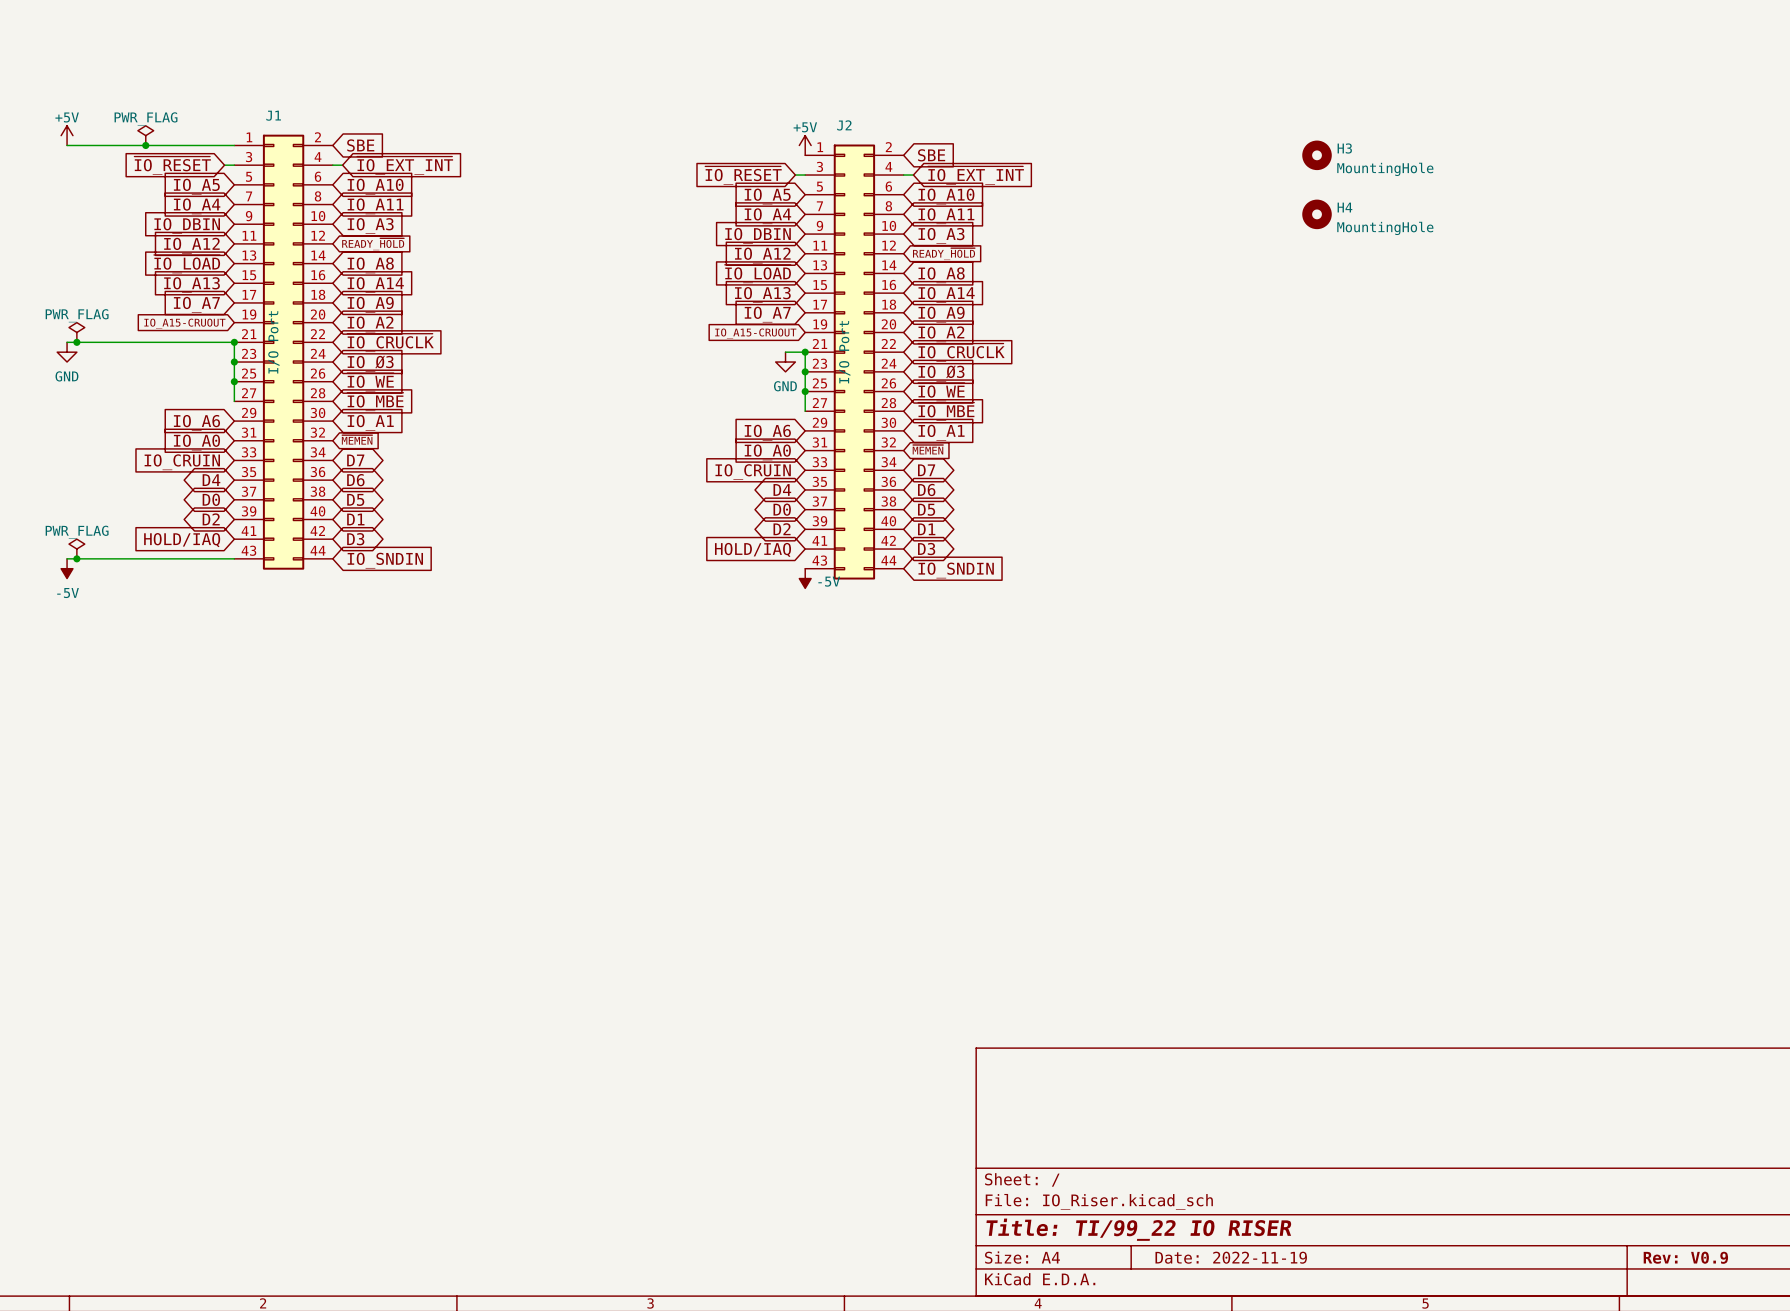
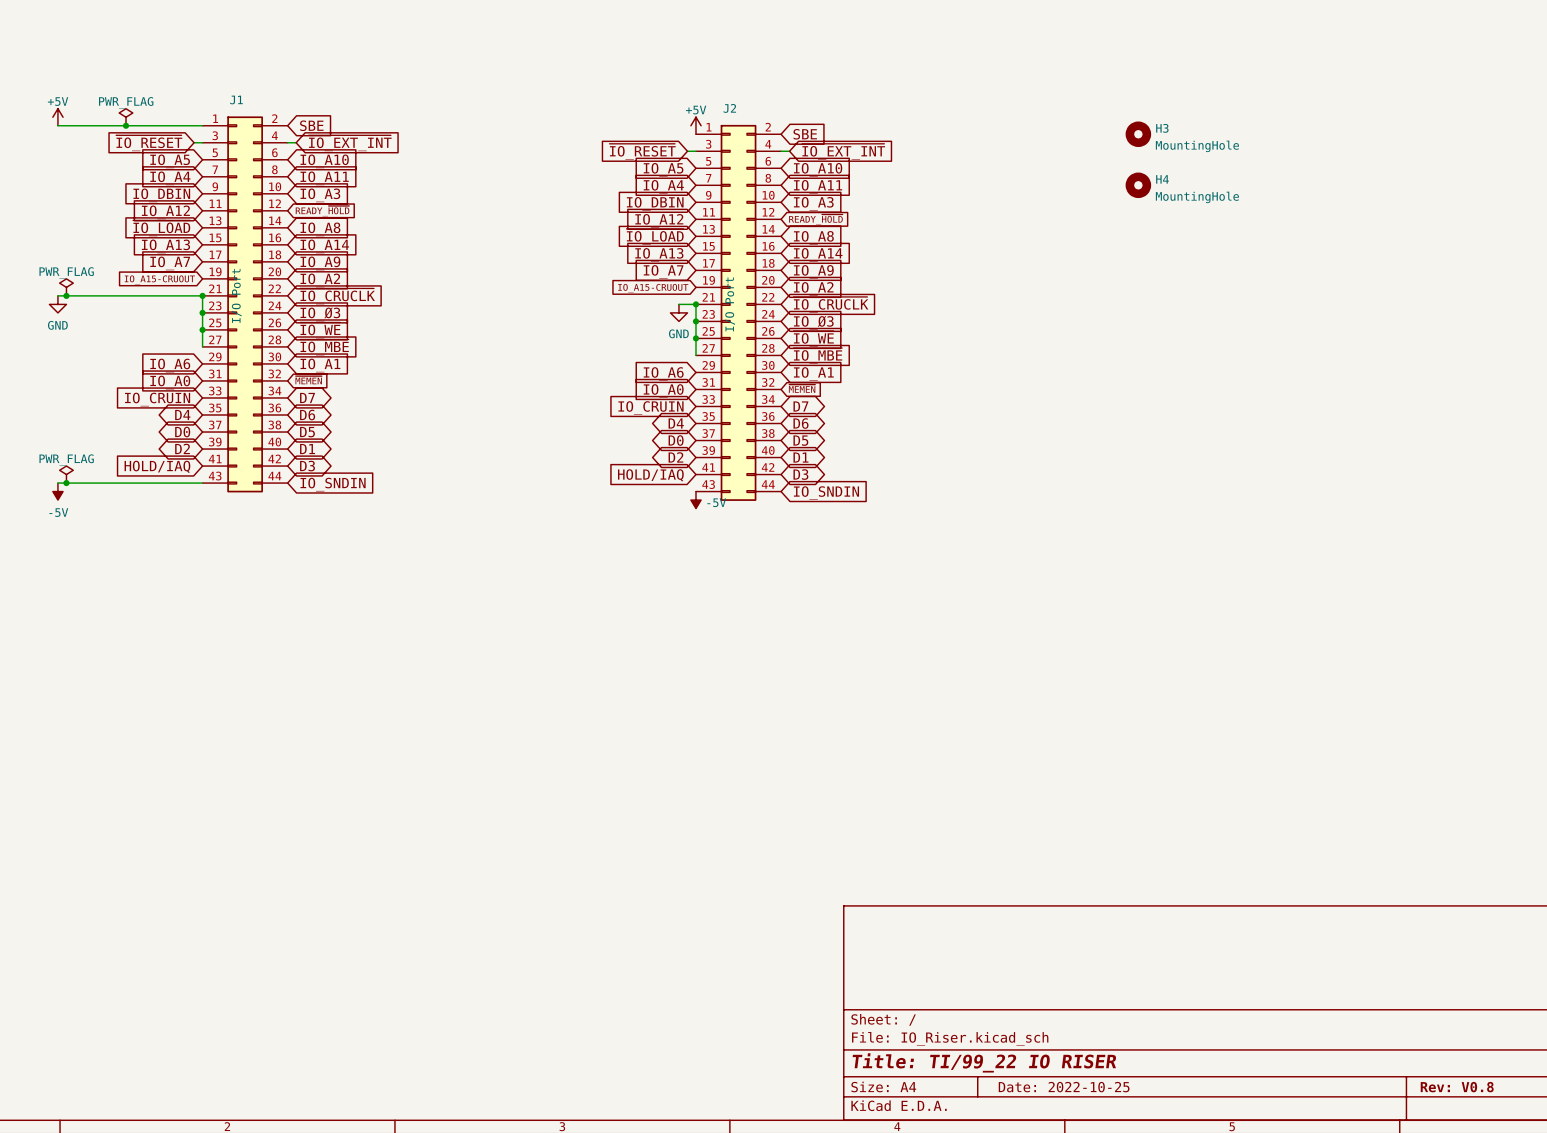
title block: Date: 2022-11-19 (1231, 1257) -> Date: 2022-10-25 (1064, 1087)
title block: Rev: V0.9 (1685, 1257) -> Rev: V0.8 (1457, 1087)

